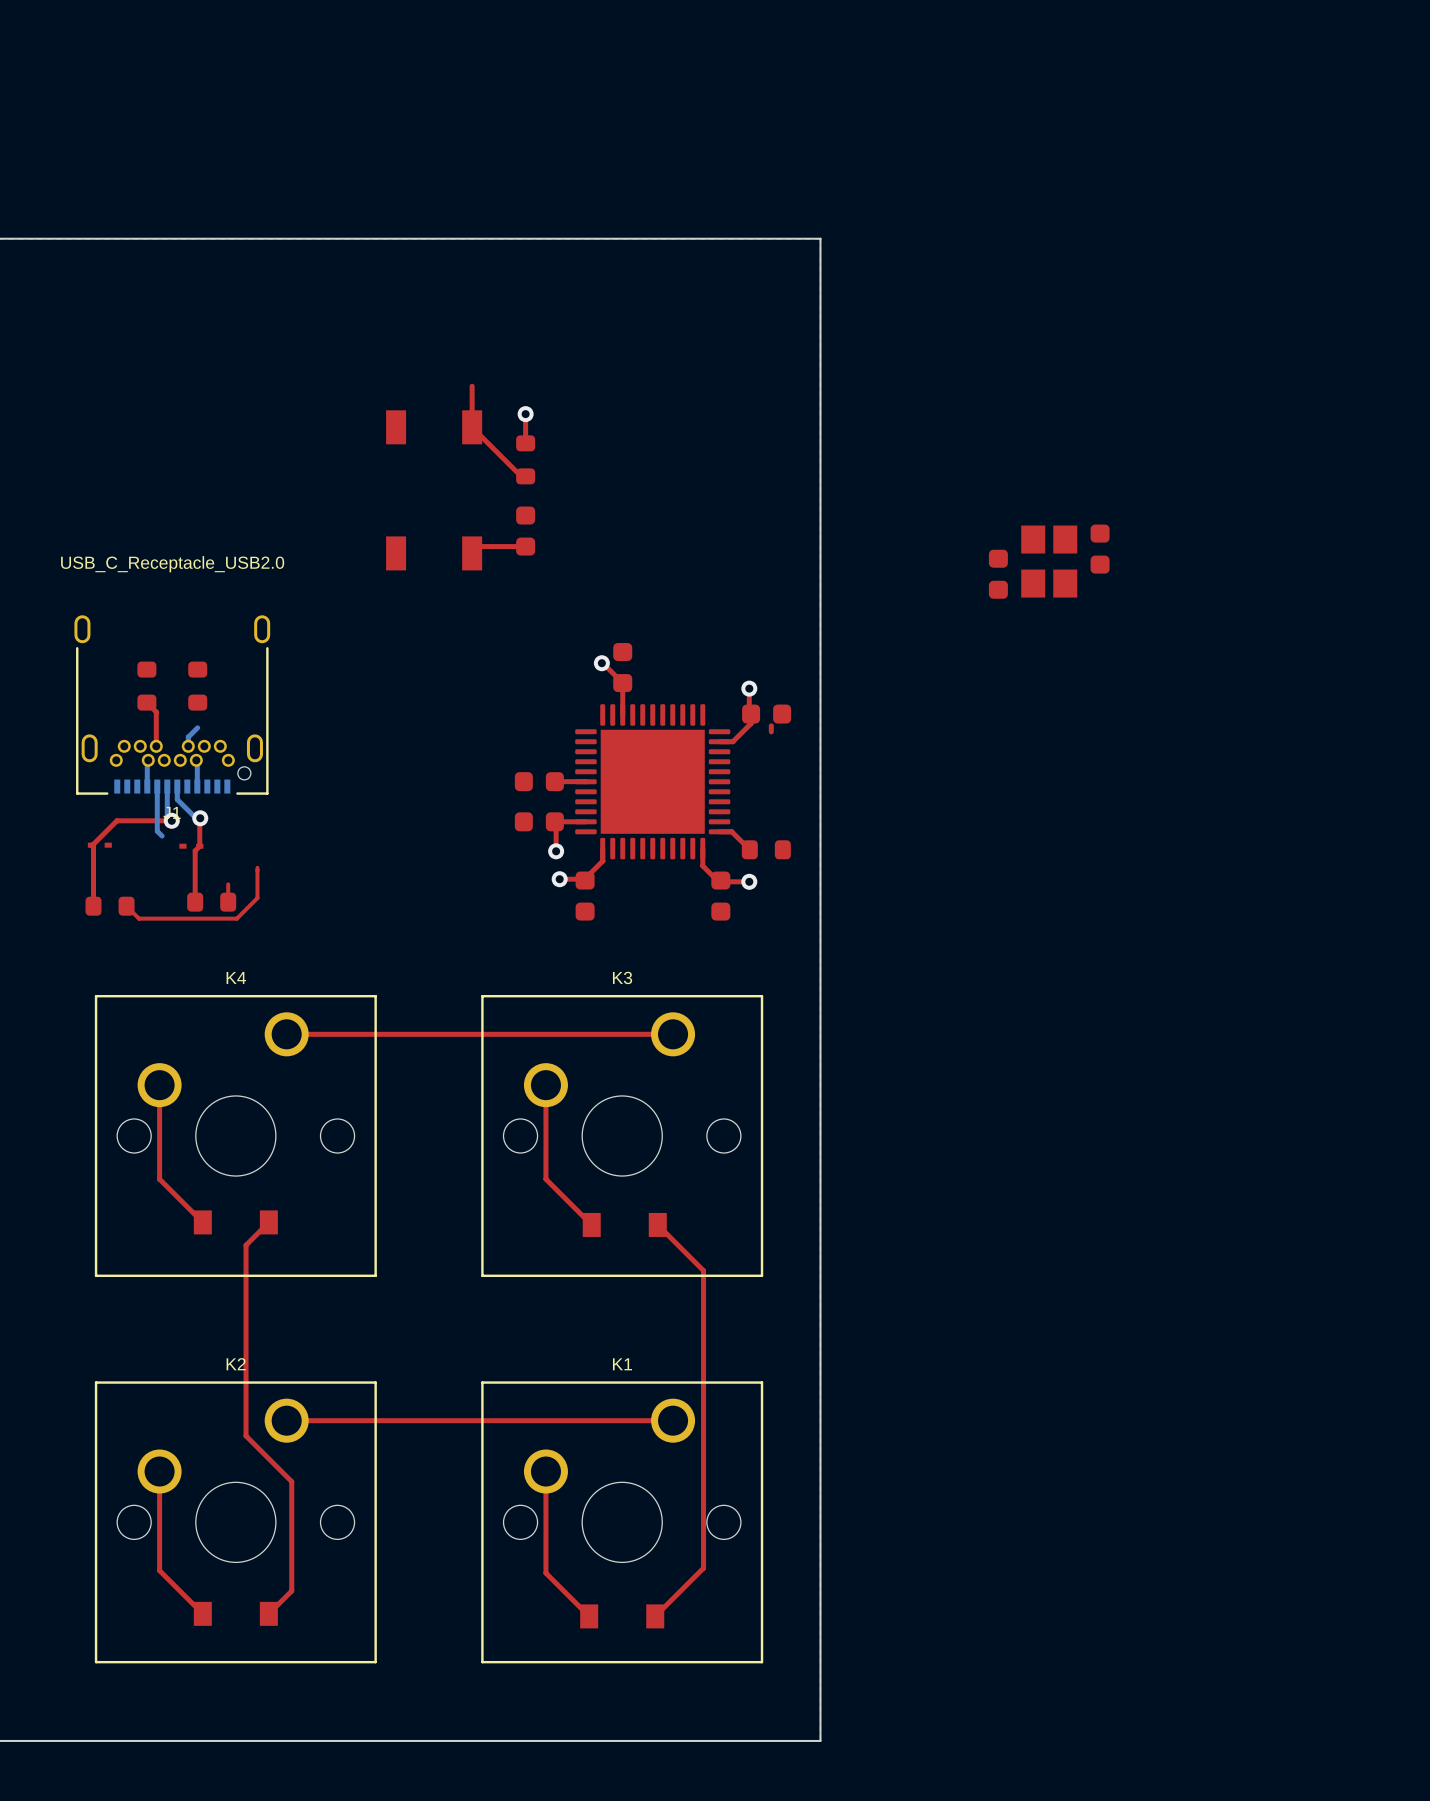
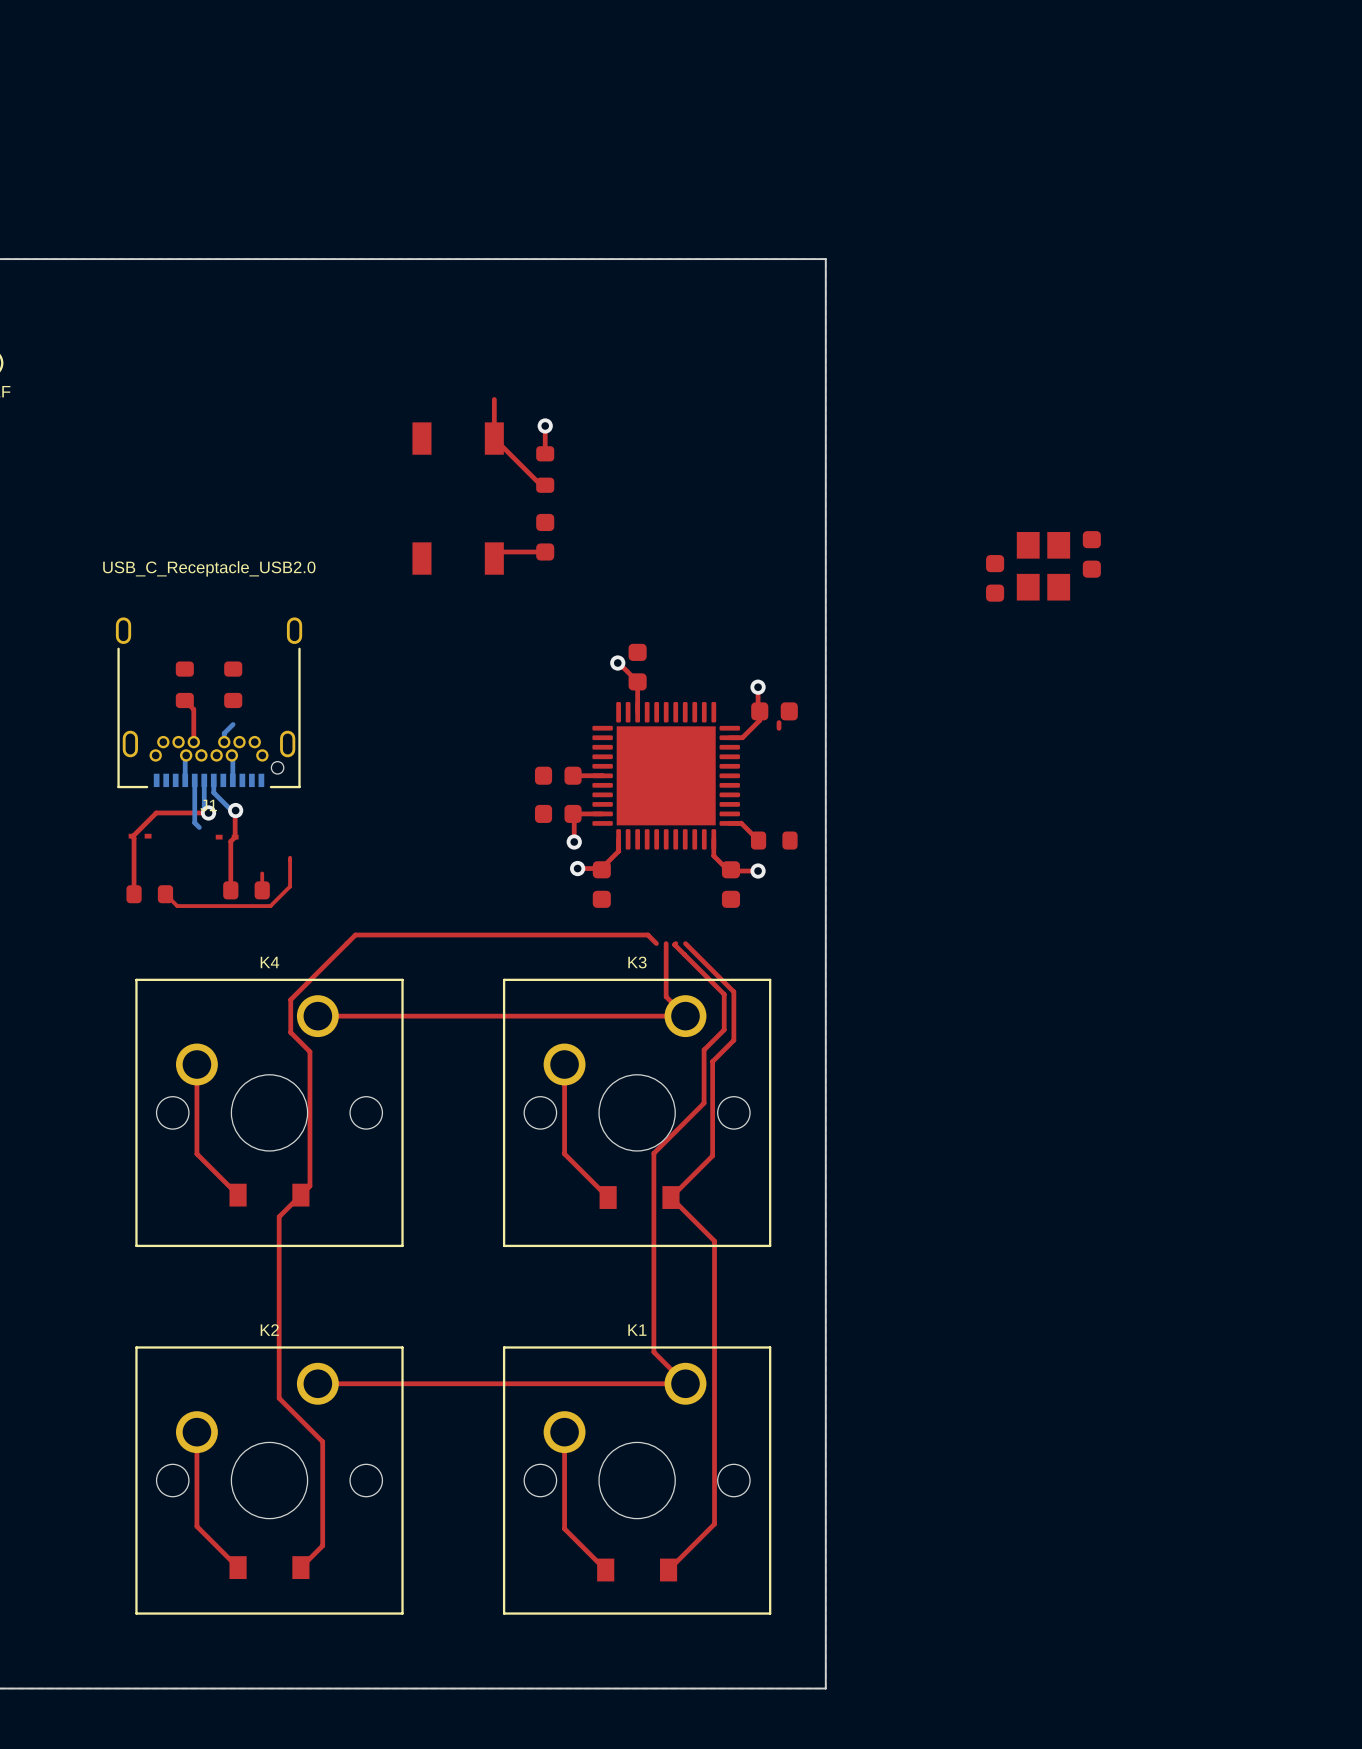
top track: none -> (656, 943) (647, 935) (355, 935) (290, 999) (290, 1032) (309, 1051) (309, 1186) (300, 1195)
top track: none -> (666, 943) (666, 996) (685, 1016)
top track: none -> (675, 943) (674, 944)
top track: none -> (685, 943) (733, 991) (733, 1040) (712, 1061) (712, 1155) (670, 1197)
top track: none -> (674, 944) (724, 994) (724, 1029) (704, 1049) (704, 1103) (653, 1153) (653, 1352) (685, 1383)

